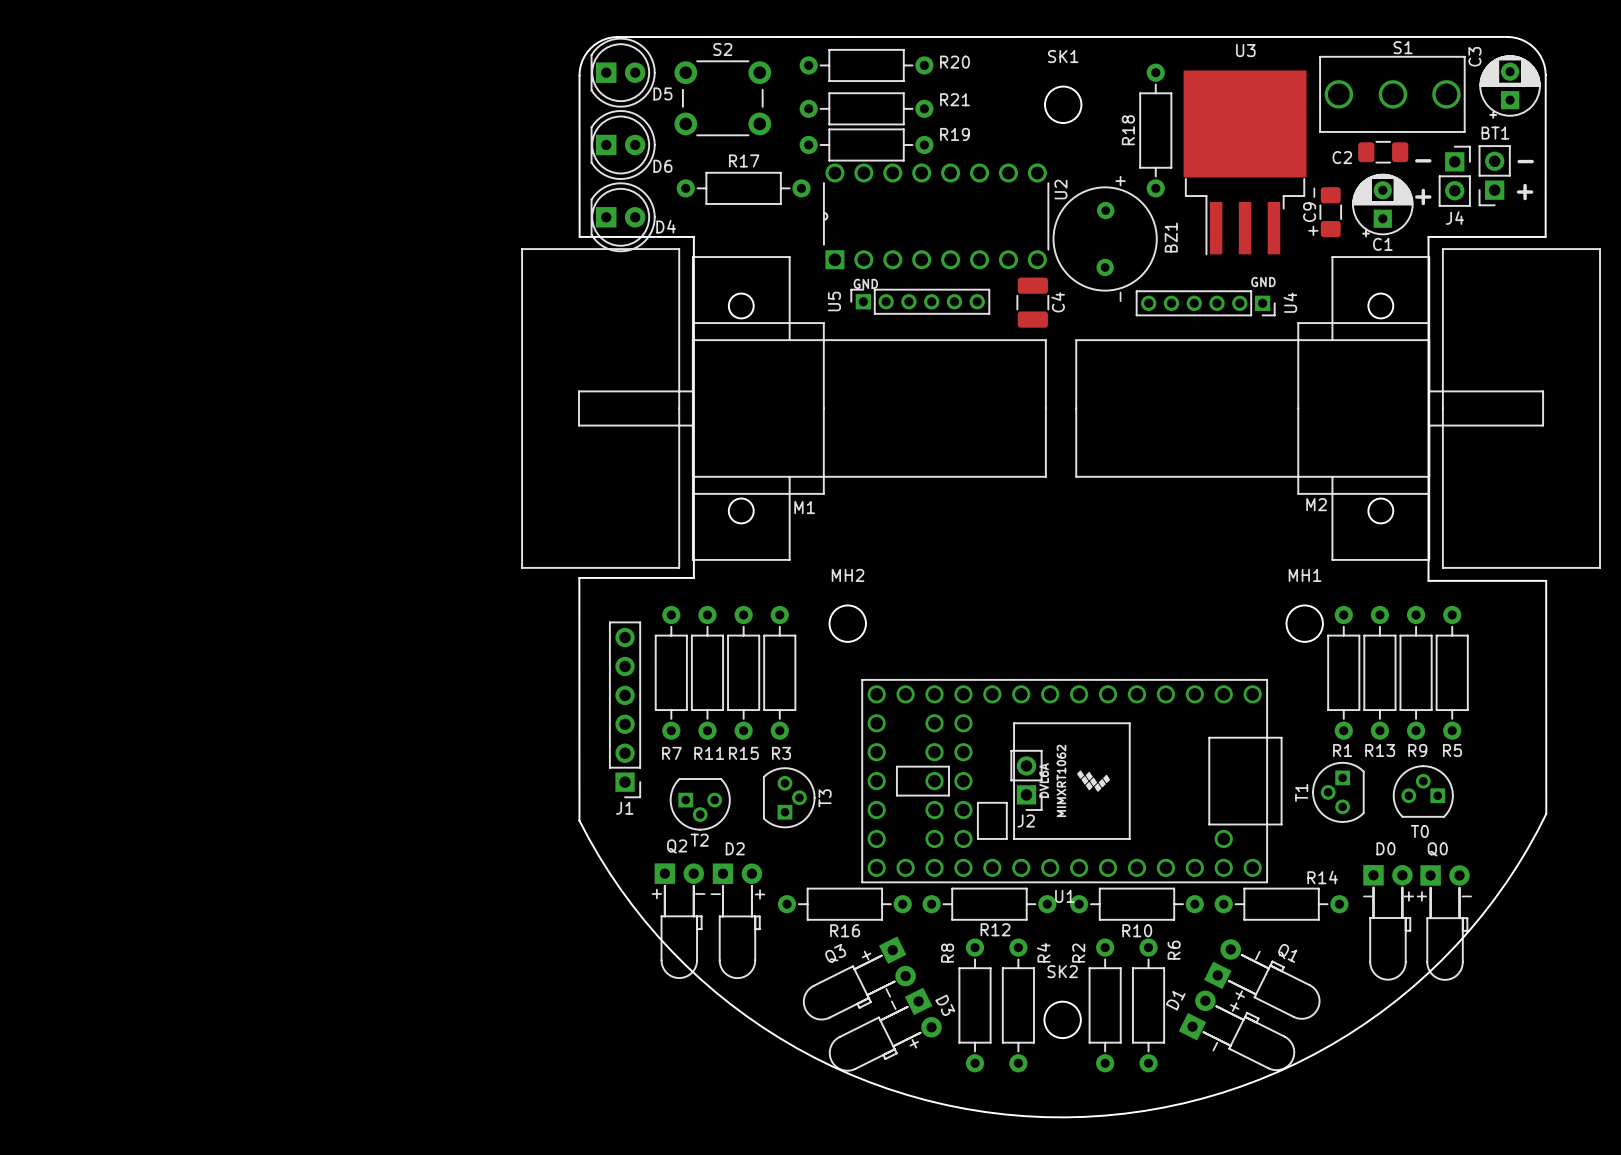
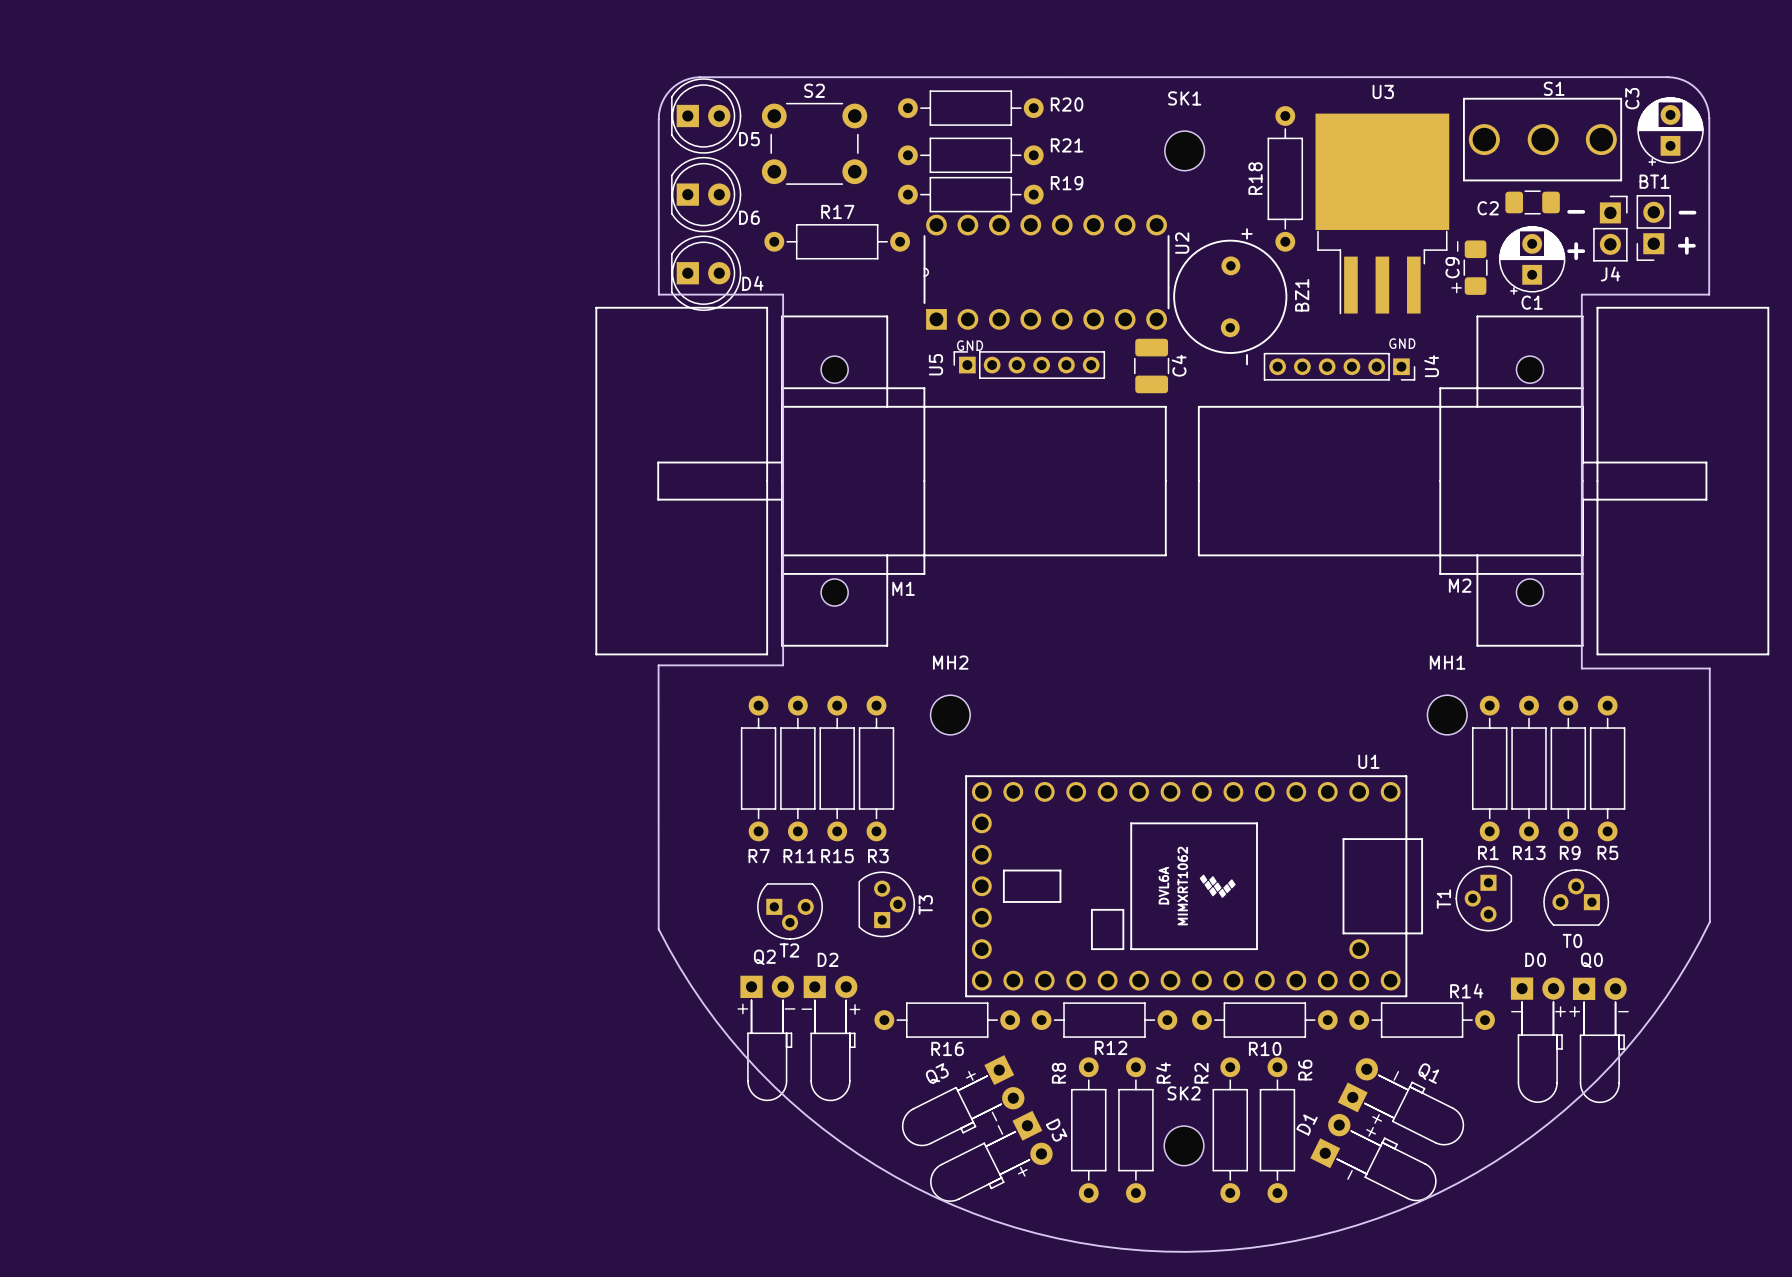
U1 footprint: [861, 679, 1283, 884] -> [965, 775, 1424, 998]
J1: (625, 709) -> none
J2: (1026, 780) -> none
U1 name position: U1 (1064, 896) -> U1 (1368, 761)

